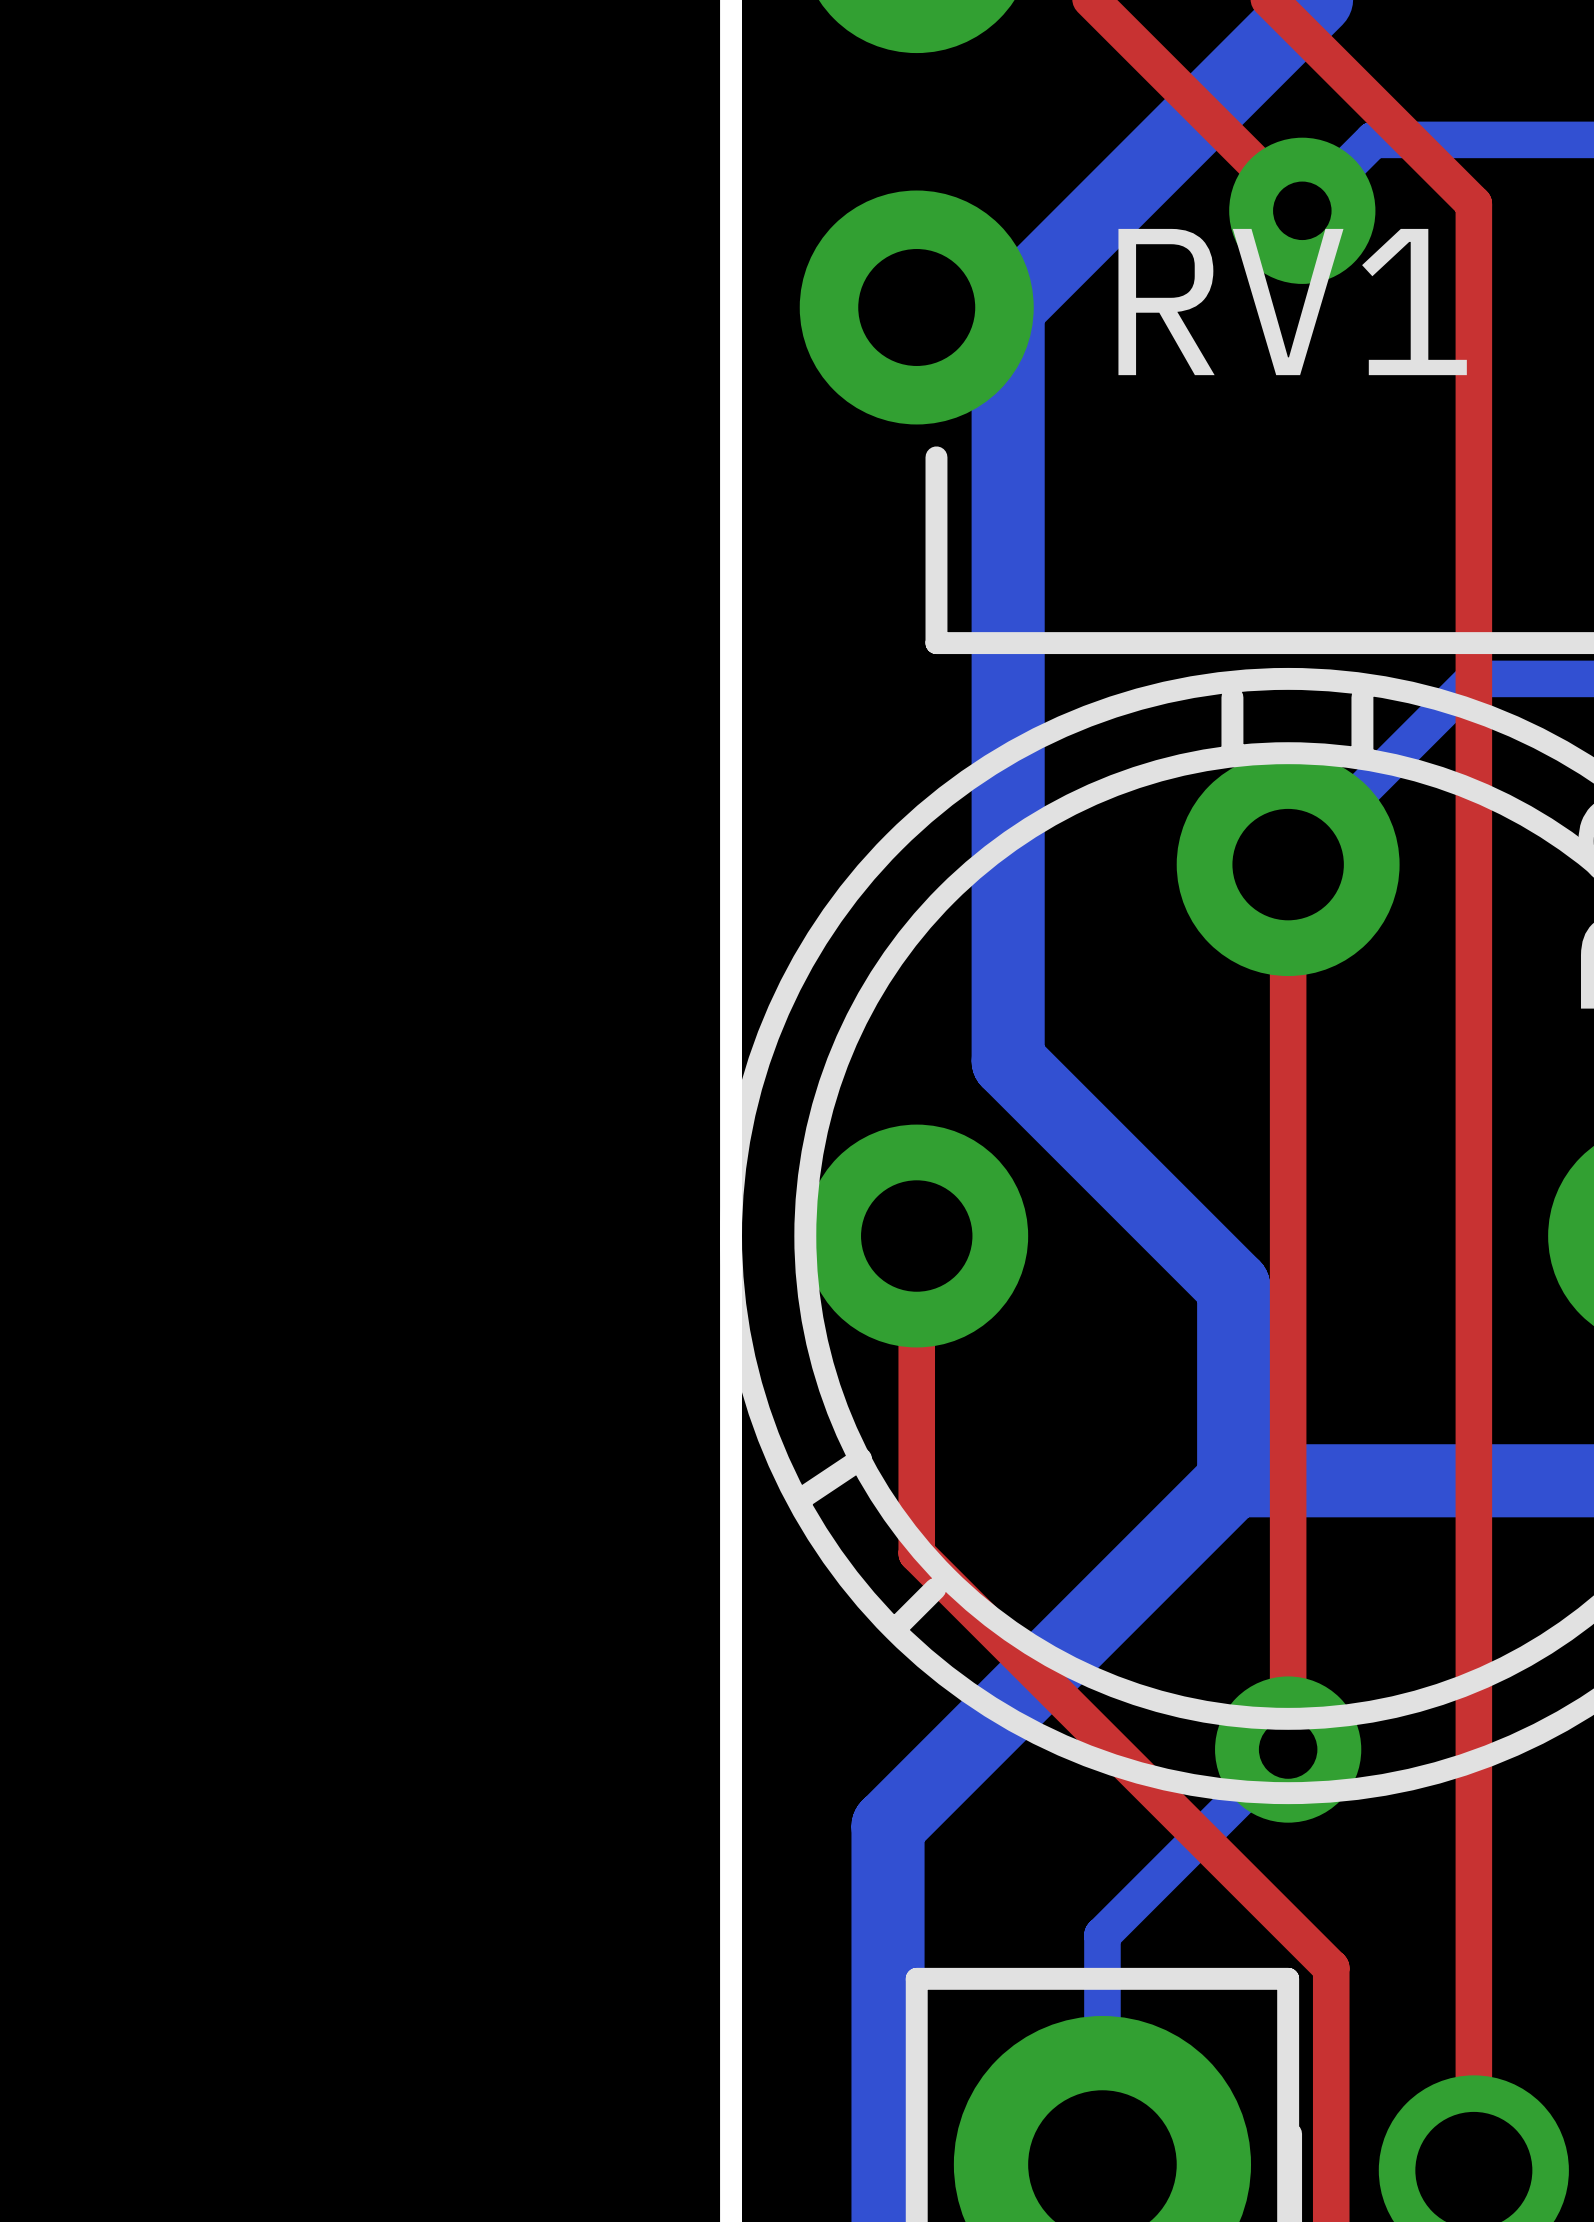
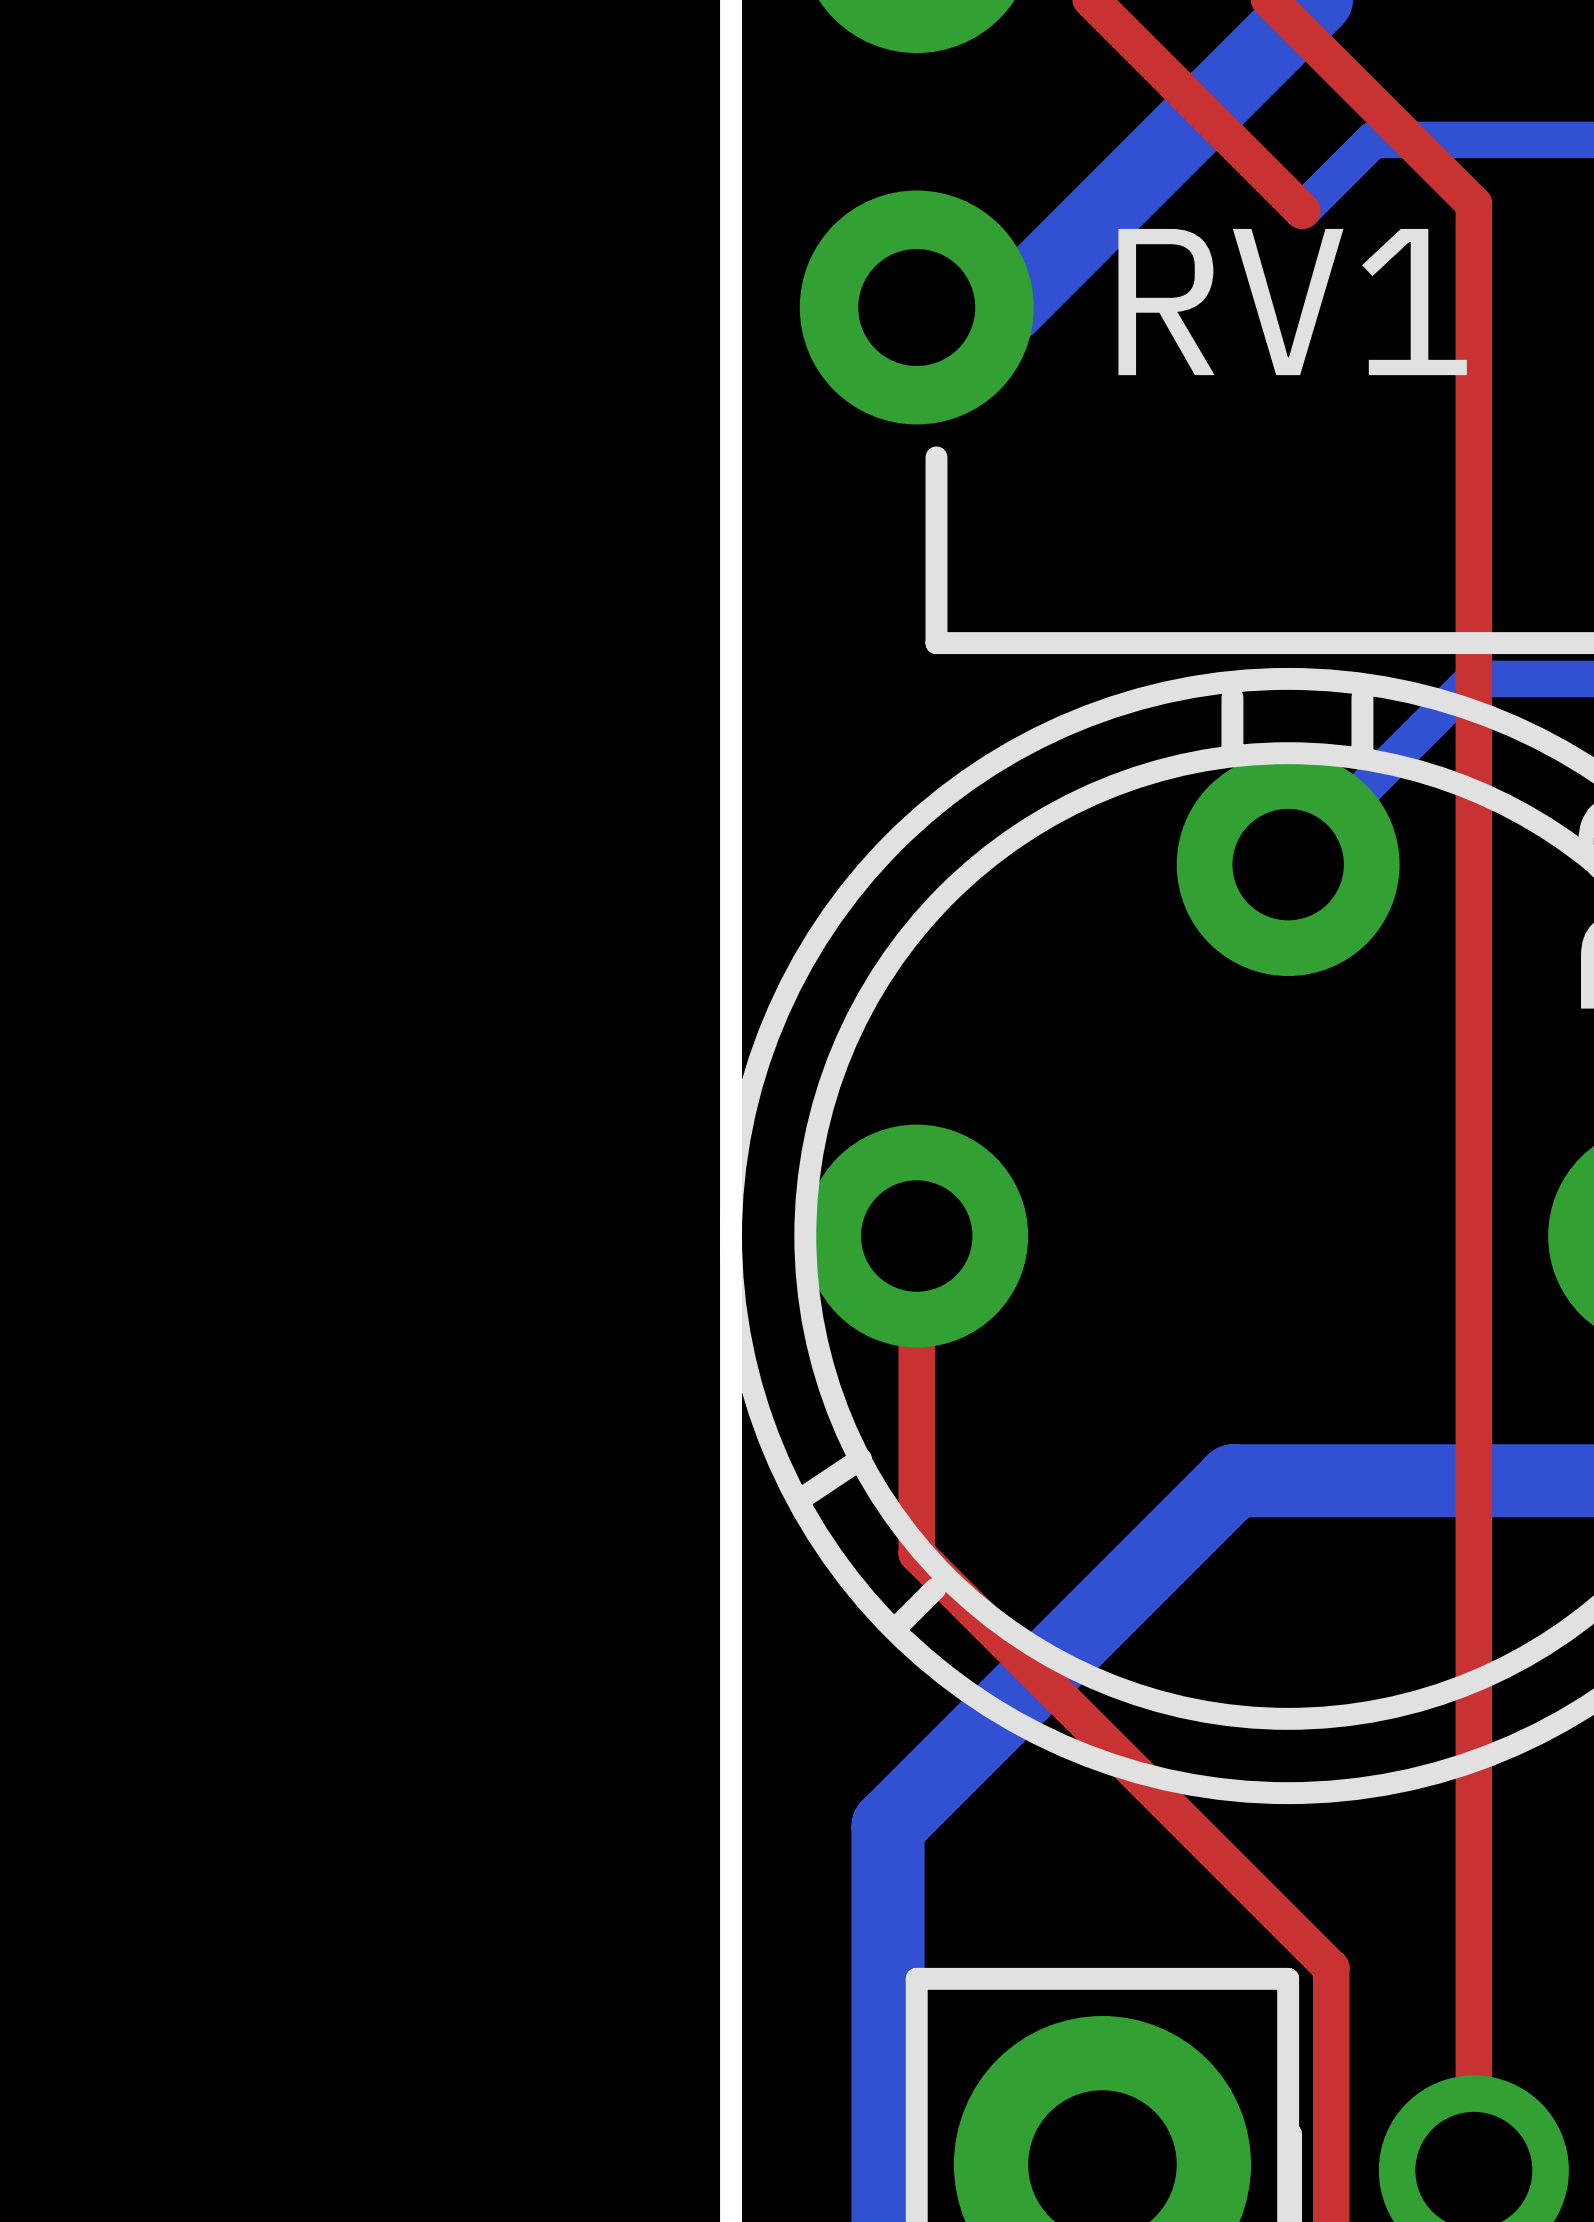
via: (1302, 210) -> none
bottom track: (916, 307) (1008, 307) (1008, 1061) (1233, 1286) (1233, 1480) -> none
top track: (1288, 864) (1288, 1749) -> none
bottom track: (1288, 1749) (1102, 1935) (1102, 2164) -> none
via: (1288, 1749) -> none

